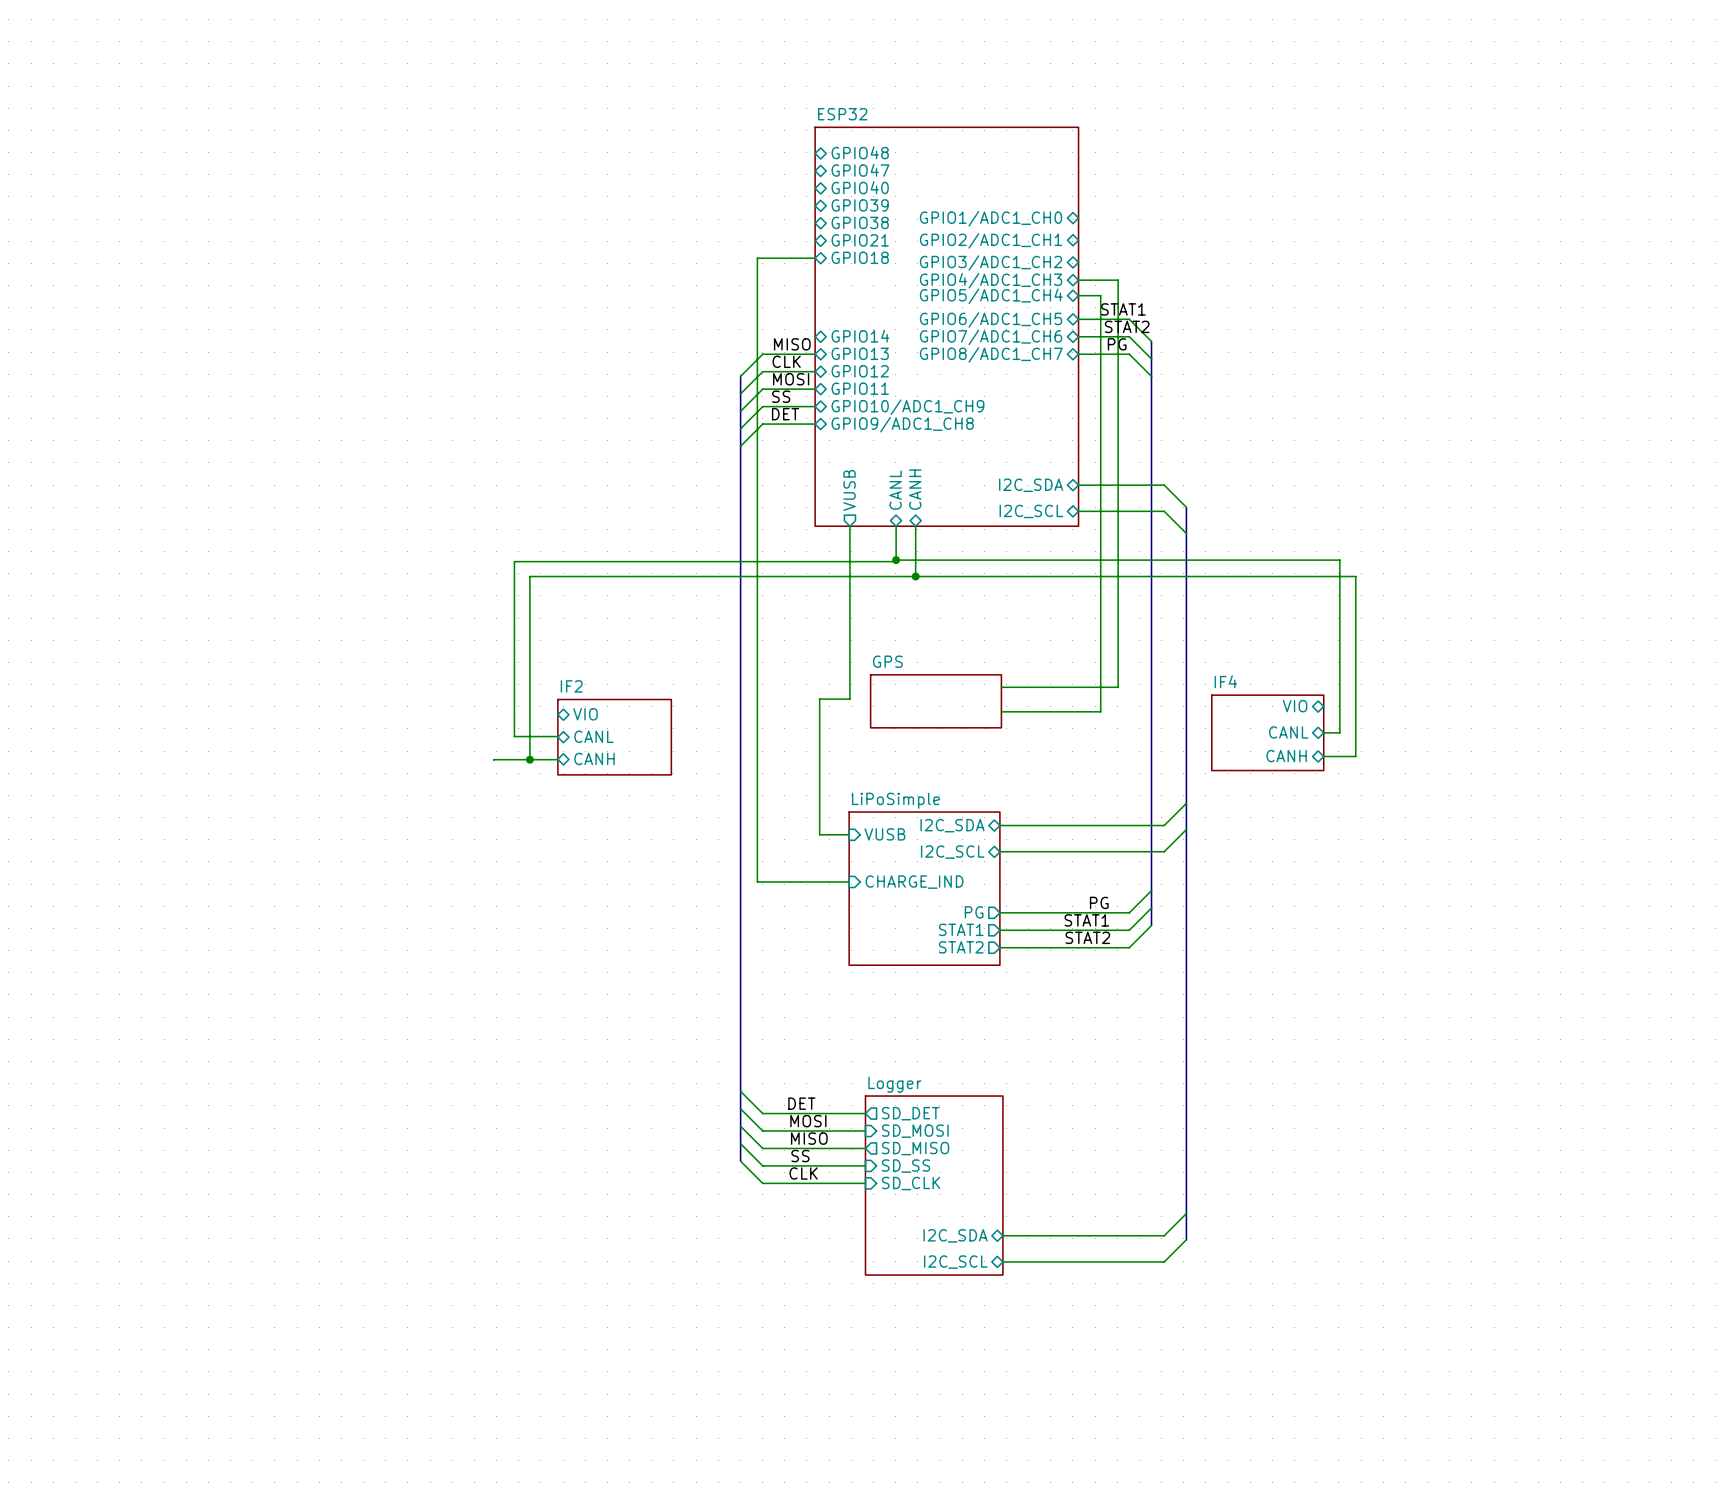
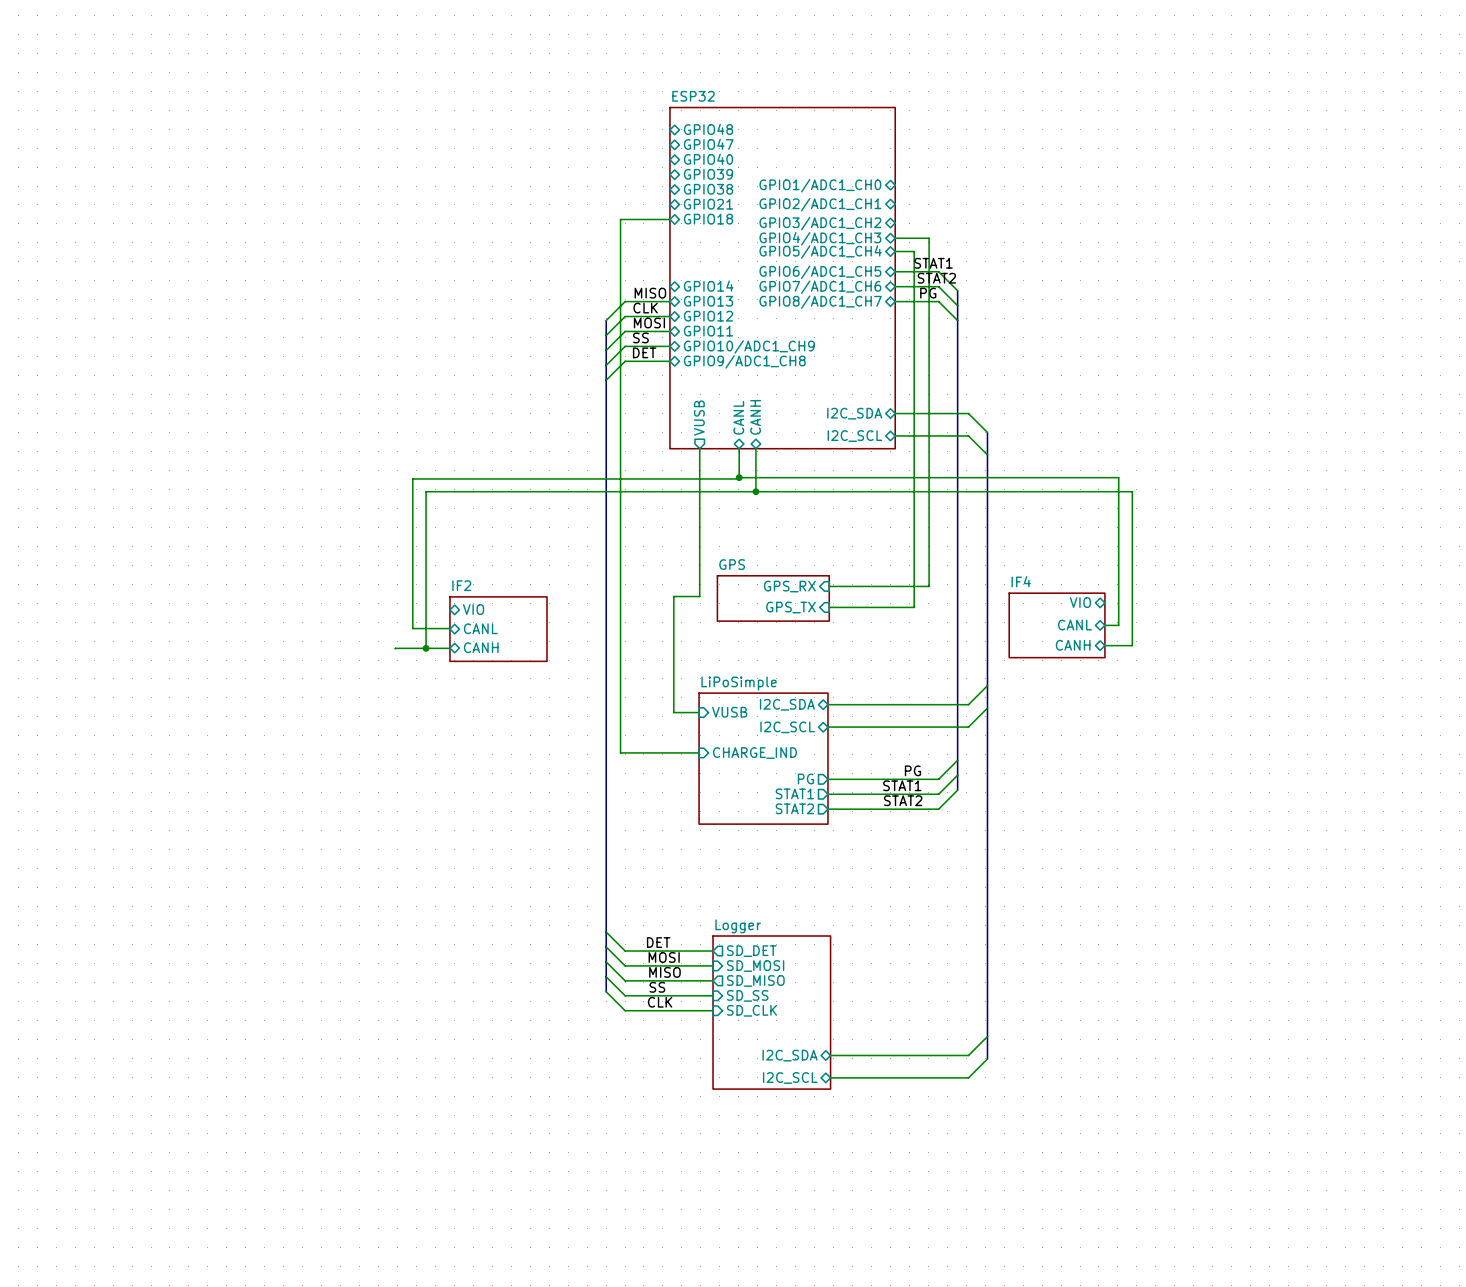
sheet pin: none -> GPS_RX (789, 586)
sheet pin: none -> GPS_TX (790, 607)

